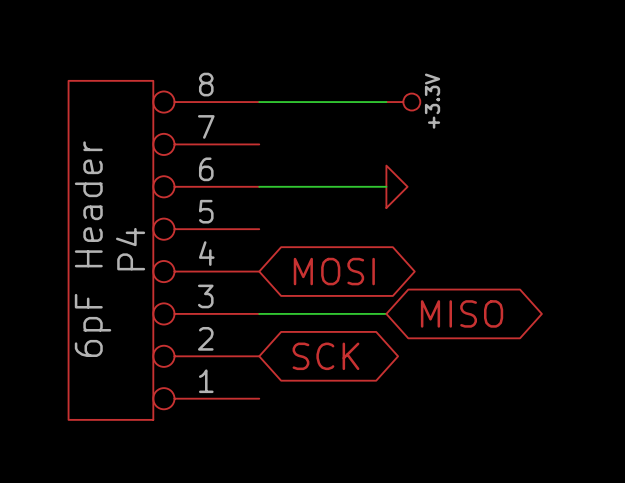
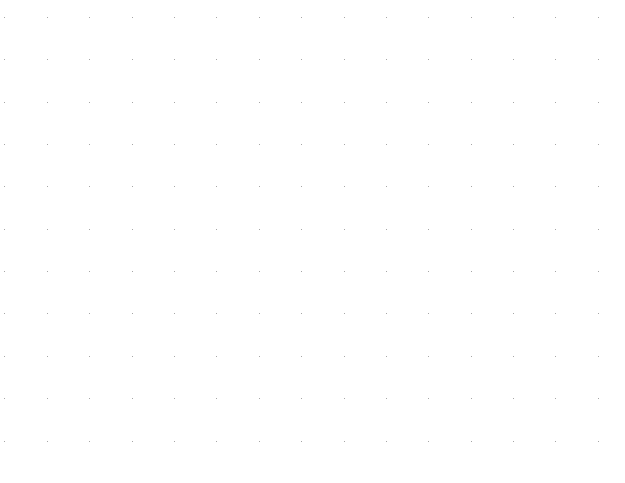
wire: (259, 102) (386, 102) -> none
power symbol: +3.3V (403, 102) -> none
wire: (259, 186) (386, 186) -> none
power symbol: (396, 186) -> none
P4: 6pF Header (163, 250) -> none
global label: MOSI (334, 271) -> none
wire: (259, 313) (386, 313) -> none
global label: MISO (462, 313) -> none
global label: SCK (325, 356) -> none

